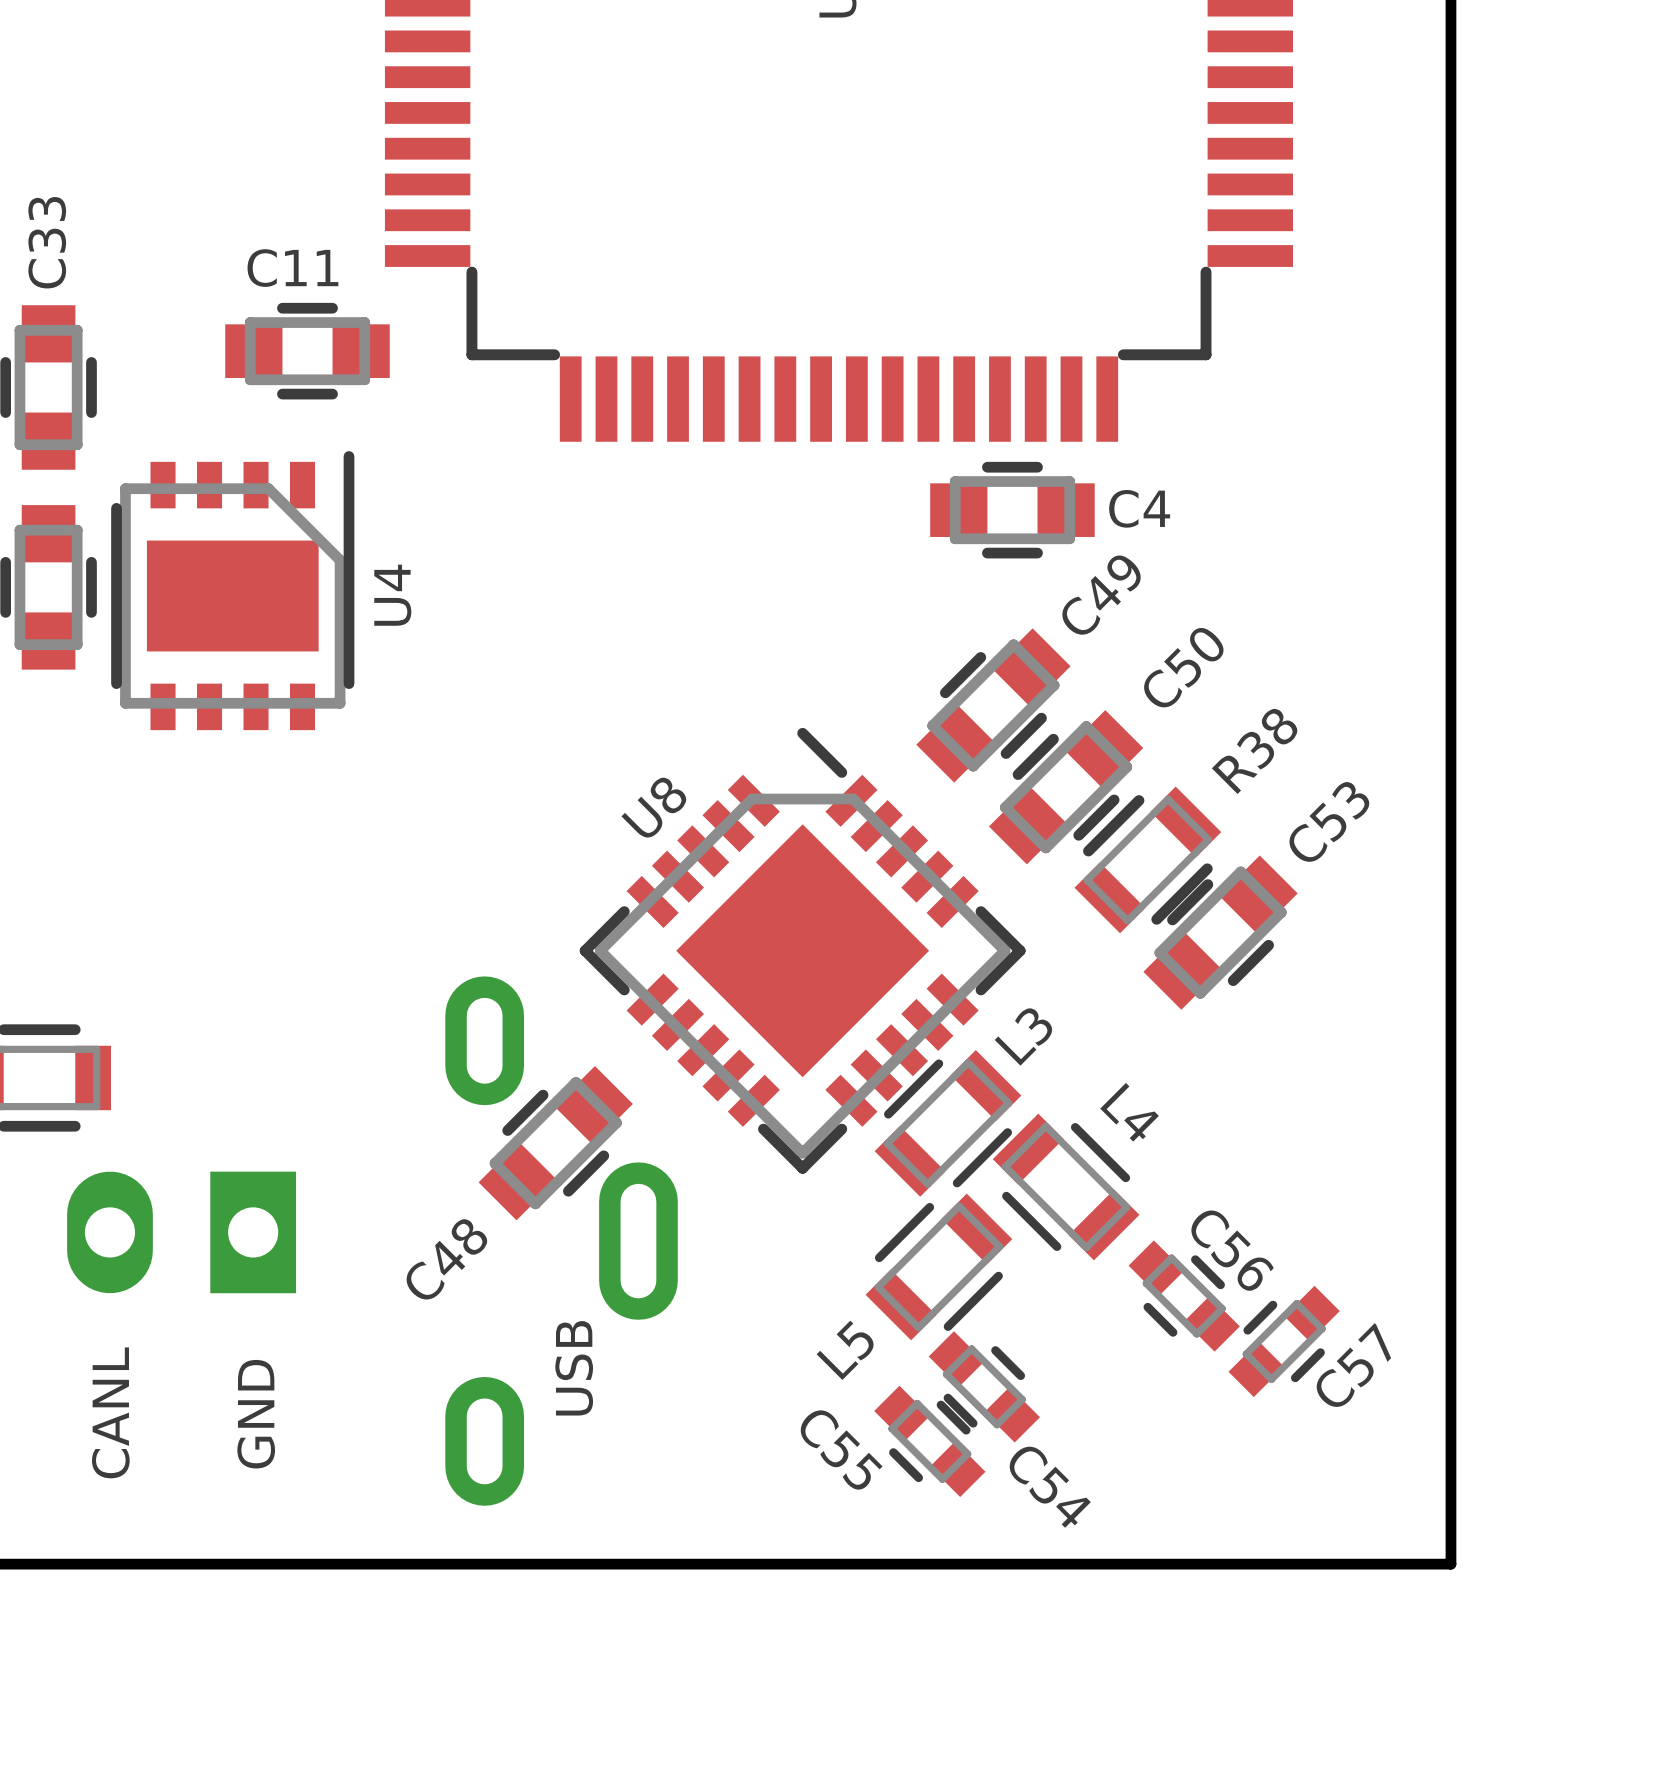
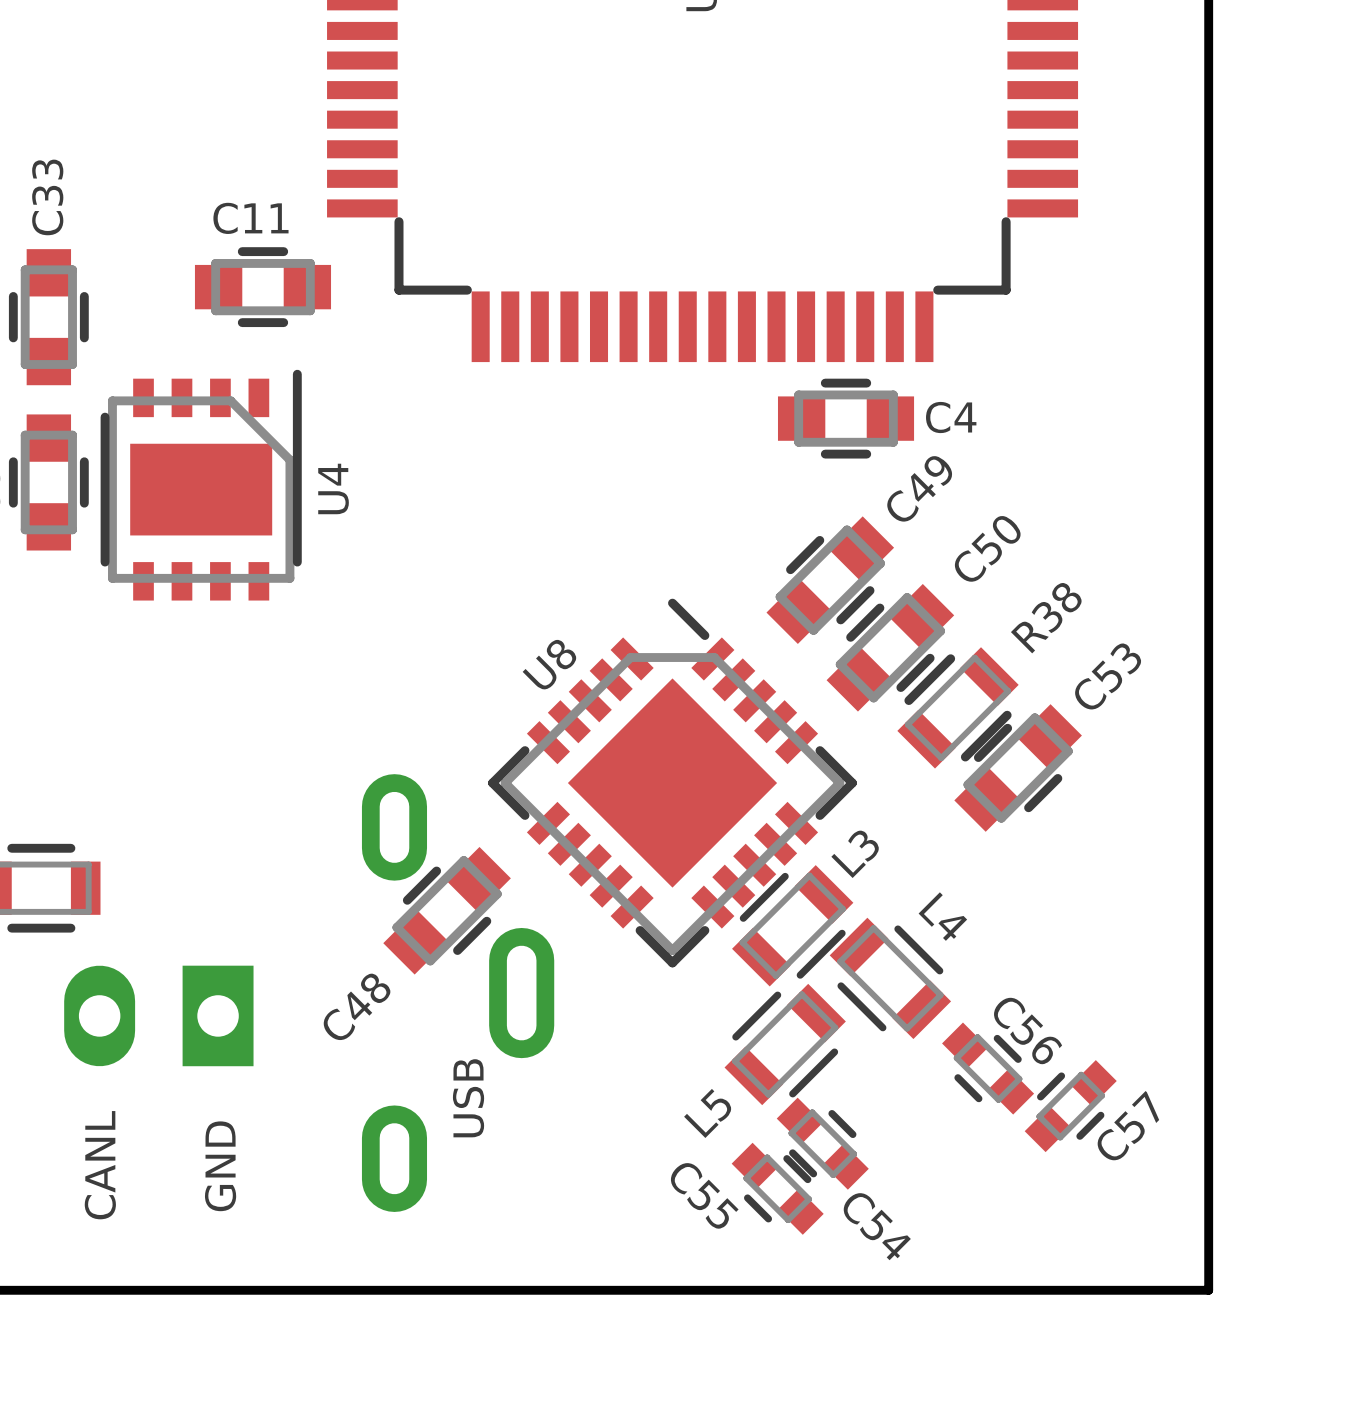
C48 position: (555, 1143) -> (447, 910)
part position: (561, 1241) -> (458, 993)
text position: USB (574, 1368) -> USB (468, 1098)

